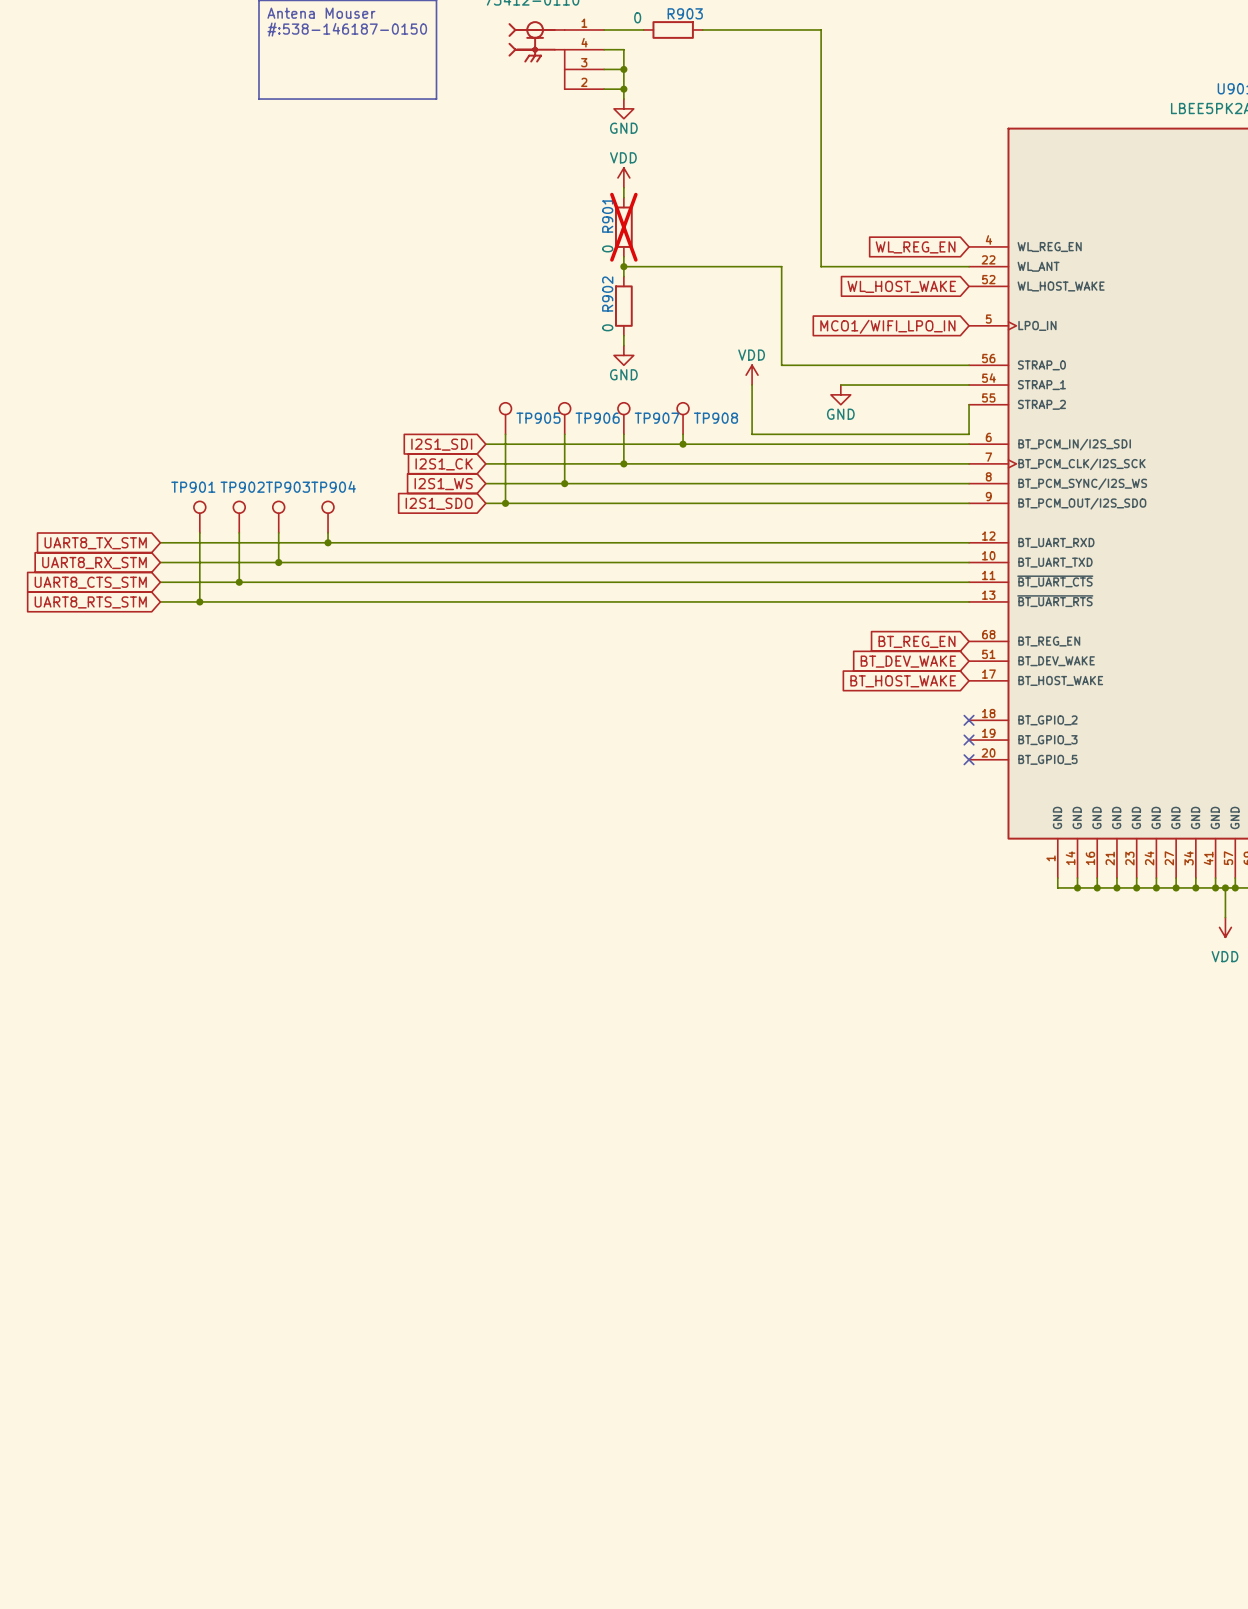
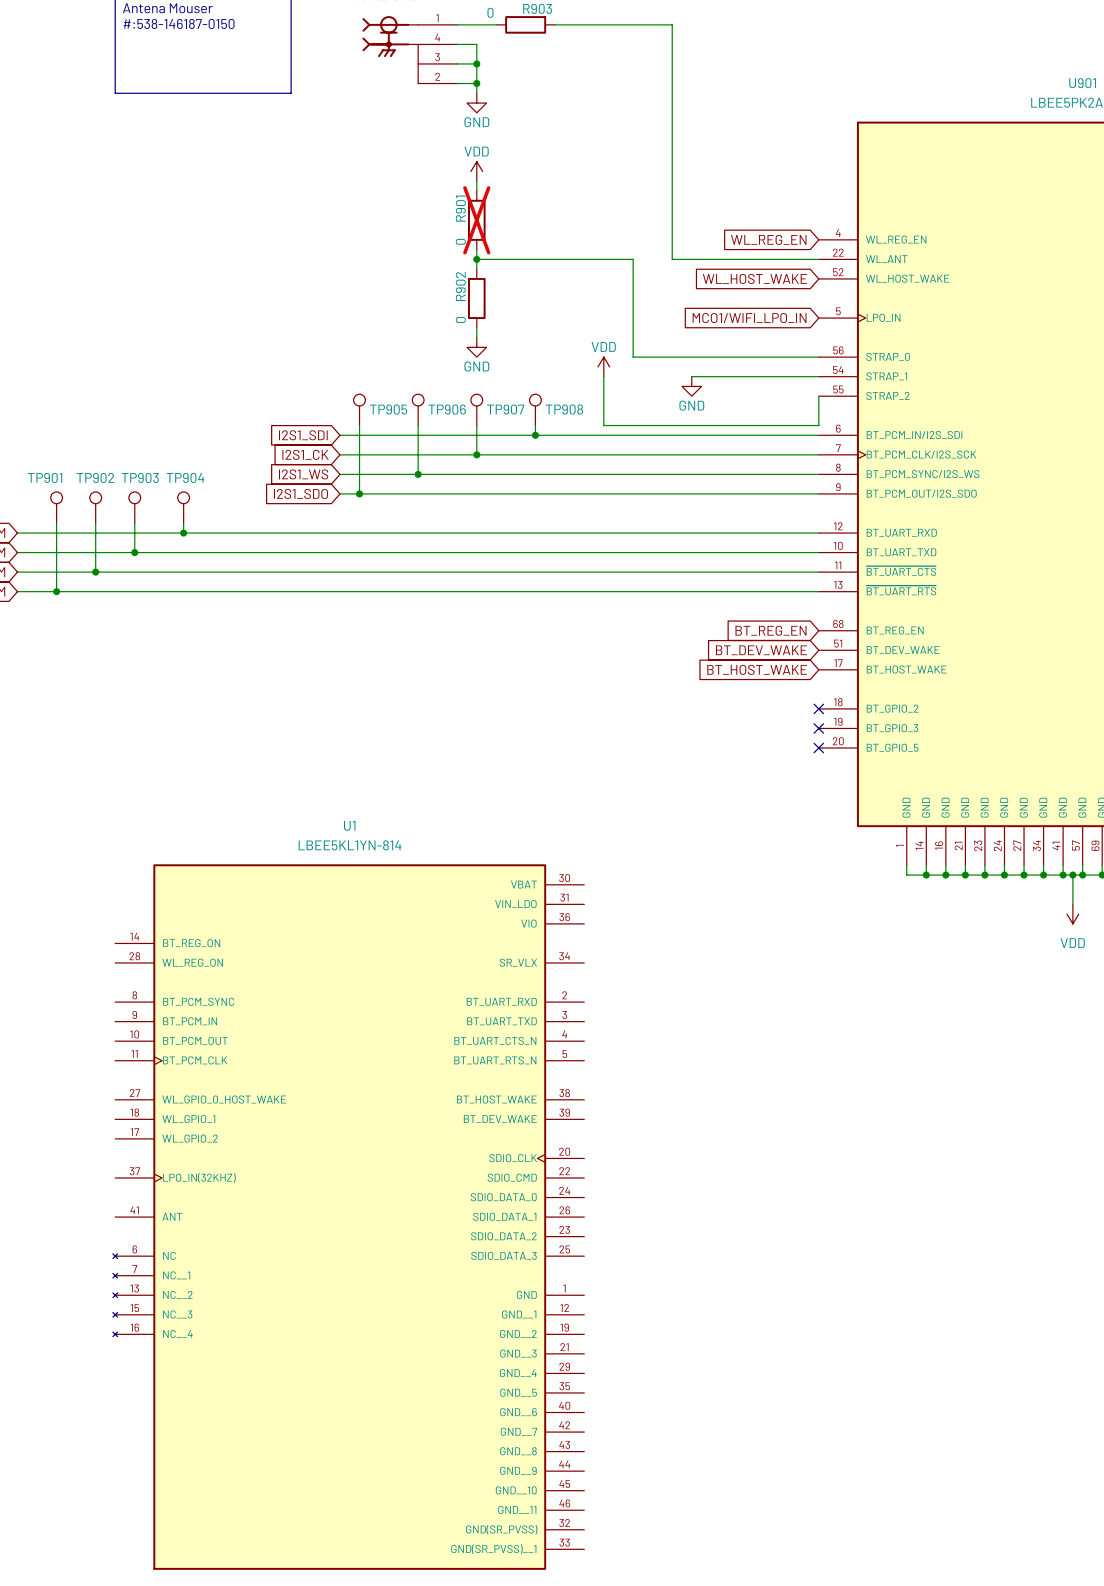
U1: none -> LBEE5KL1YN-814 (348, 1217)

